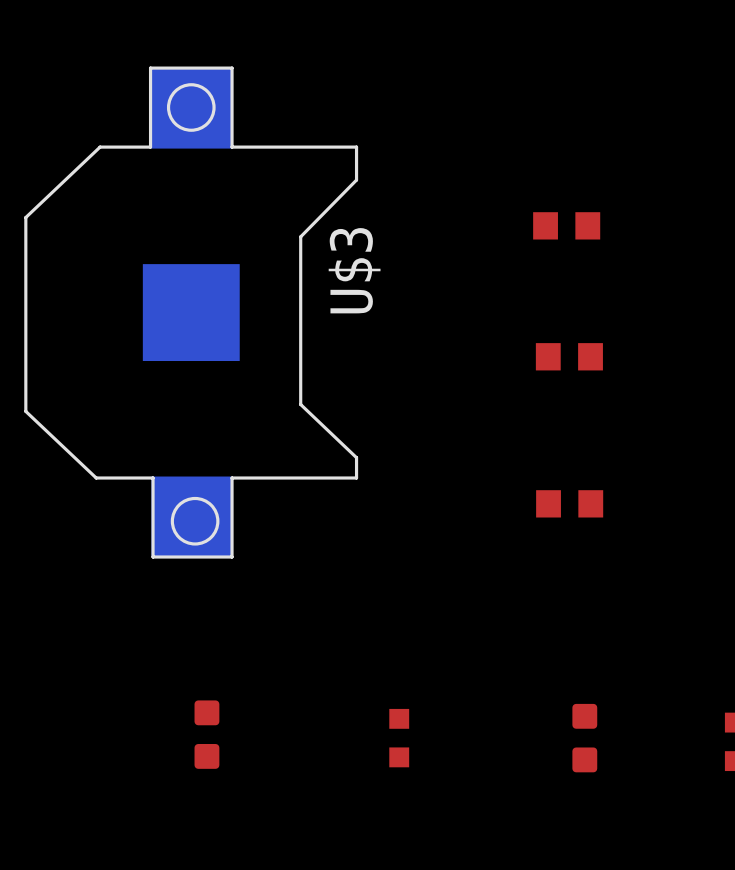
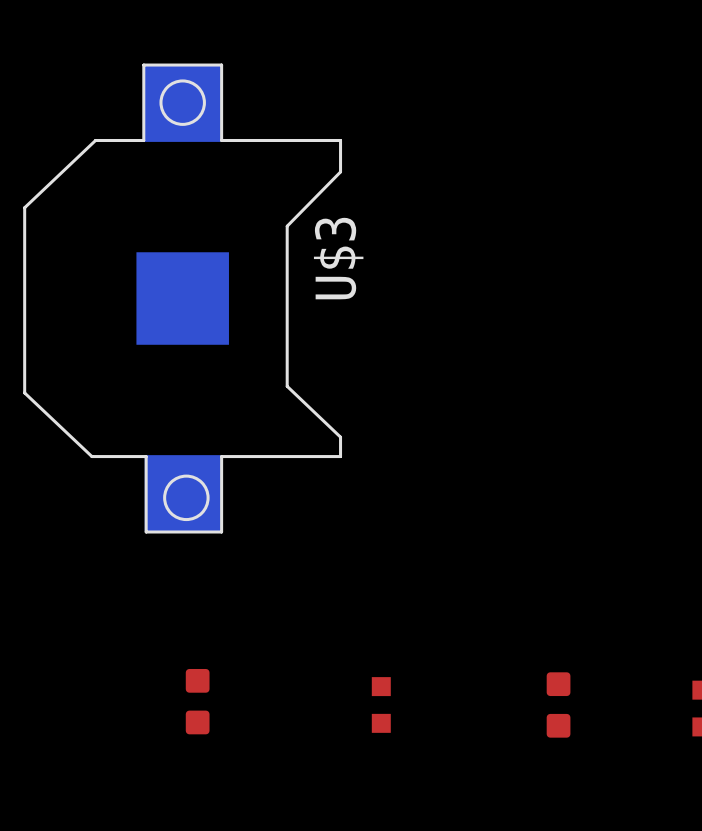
part: (566, 225) -> none
part: (569, 356) -> none
part: (569, 503) -> none

